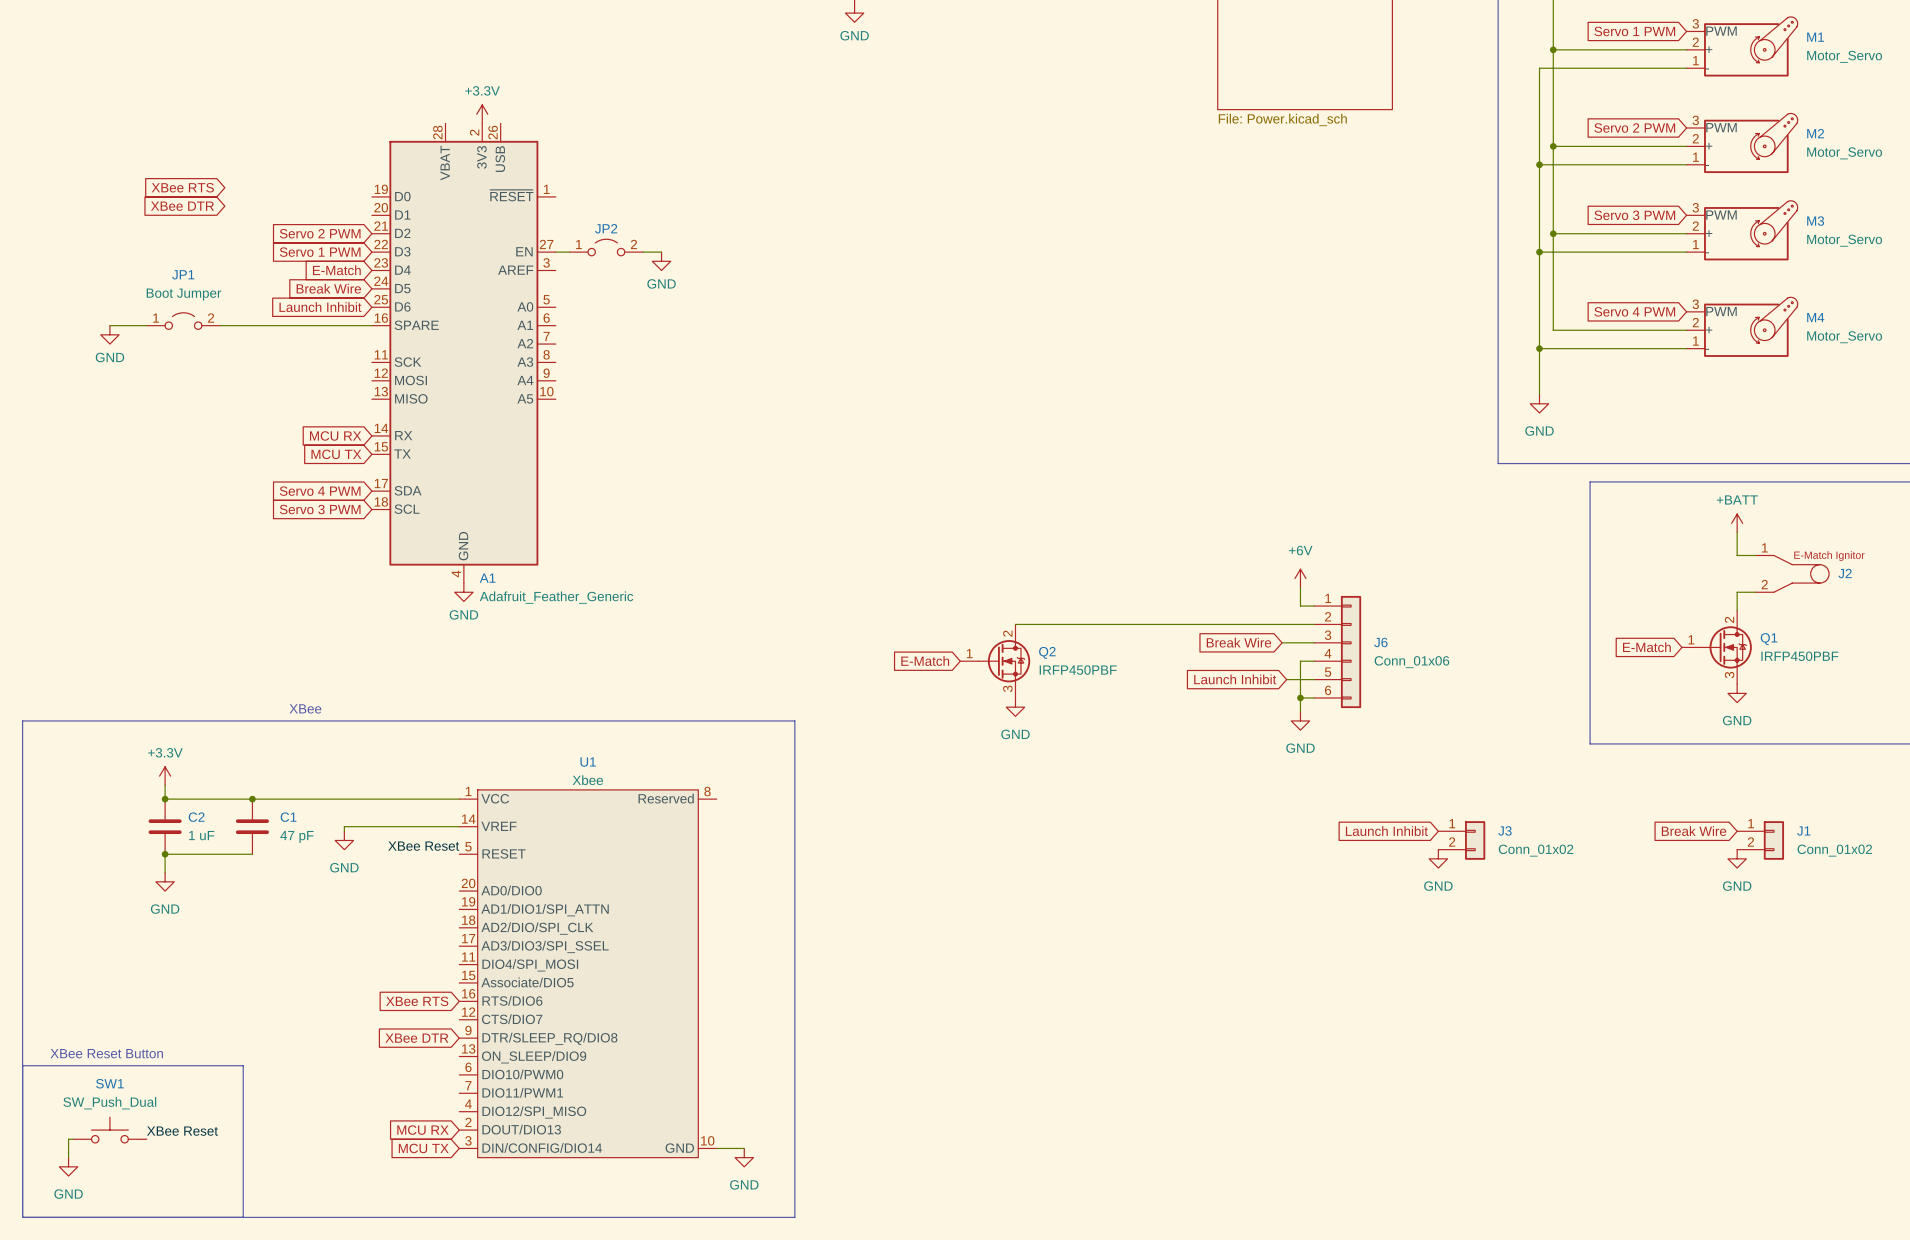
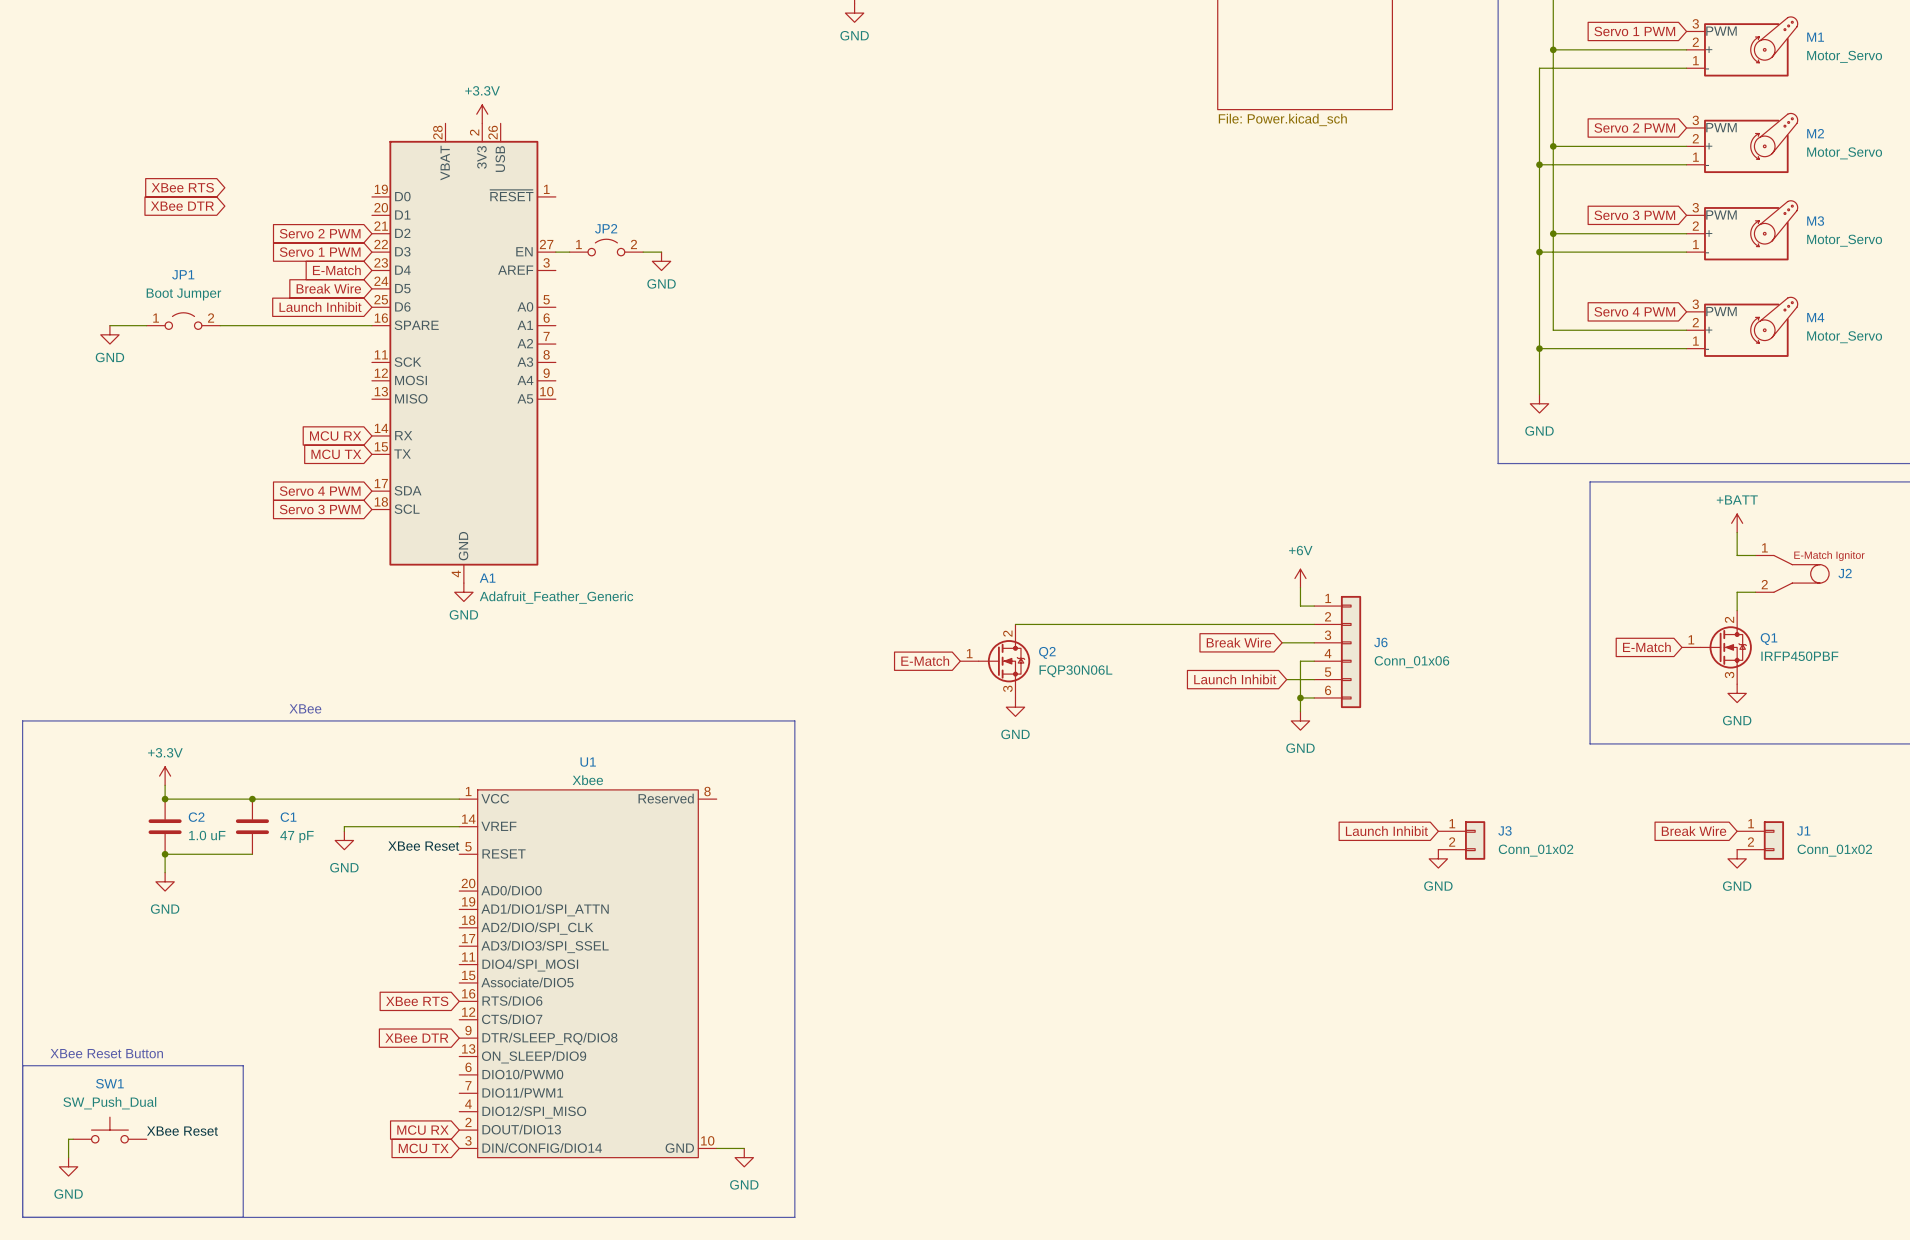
Q2 value: IRFP450PBF (1078, 670) -> FQP30N06L (1075, 671)
C2 value: 1 uF (201, 835) -> 1.0 uF (207, 835)

